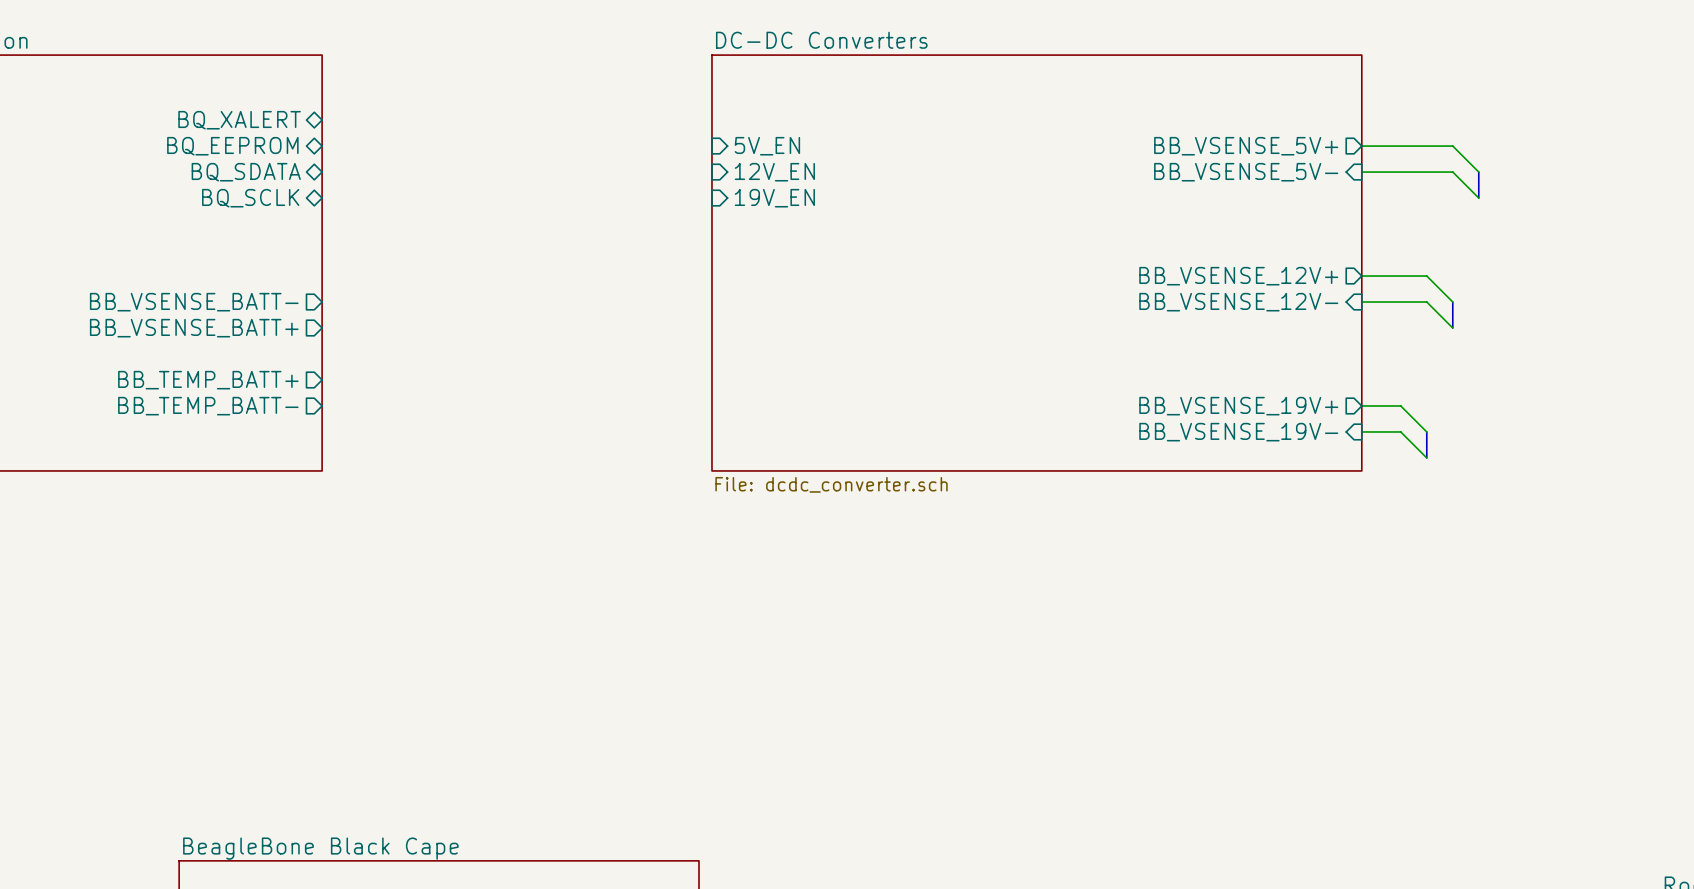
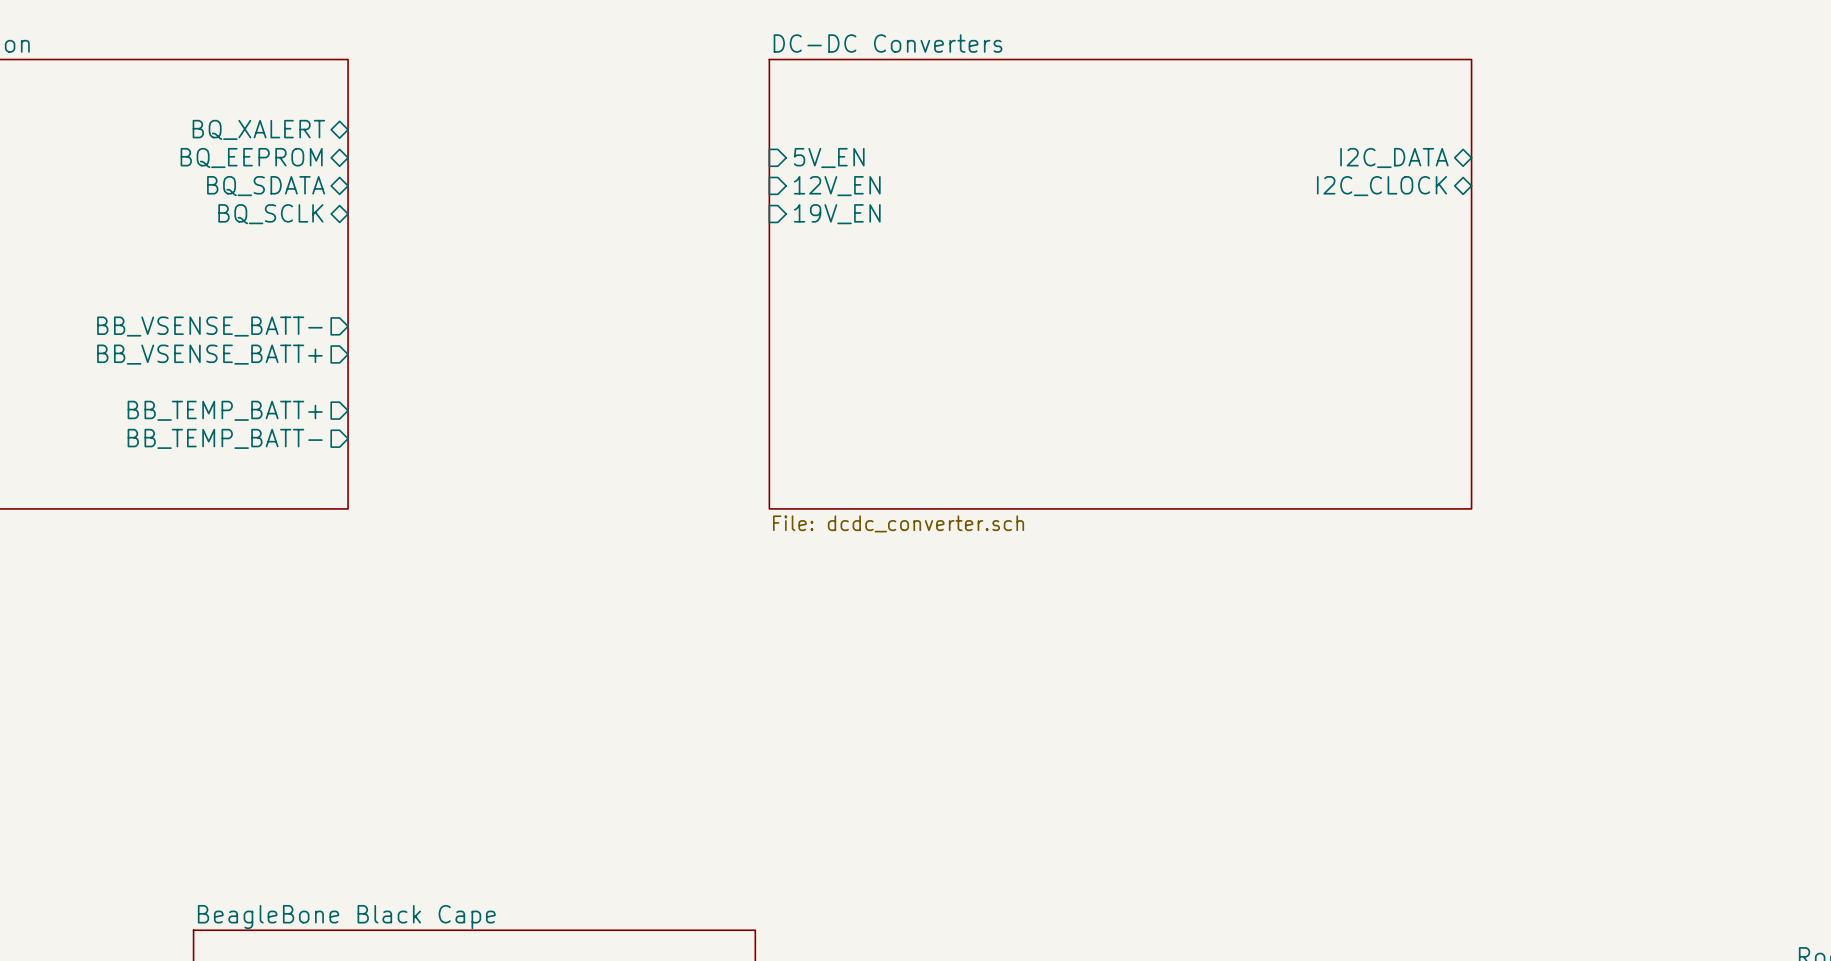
sheet pin shape: output (1246, 146) -> bidirectional (1394, 158)
sheet pin: BB_VSENSE_5V+ (1246, 146) -> I2C_DATA (1394, 158)
wire: (1361, 146) (1452, 146) (1478, 172) -> none
sheet pin shape: input (1246, 172) -> bidirectional (1381, 186)
sheet pin: BB_VSENSE_5V- (1246, 172) -> I2C_CLOCK (1381, 186)
wire: (1361, 172) (1452, 172) (1478, 198) -> none
bus: (1478, 172) (1478, 198) -> none
sheet pin: BB_VSENSE_12V+ (1238, 276) -> none
wire: (1361, 276) (1426, 276) (1452, 302) -> none
sheet pin: BB_VSENSE_12V- (1238, 302) -> none
wire: (1361, 302) (1426, 302) (1452, 328) -> none
bus: (1452, 302) (1452, 328) -> none
wire: (1361, 405) (1400, 405) (1426, 431) -> none
sheet pin: BB_VSENSE_19V+ (1238, 406) -> none
wire: (1361, 431) (1400, 431) (1426, 457) -> none
bus: (1426, 431) (1426, 457) -> none
sheet pin: BB_VSENSE_19V- (1238, 432) -> none

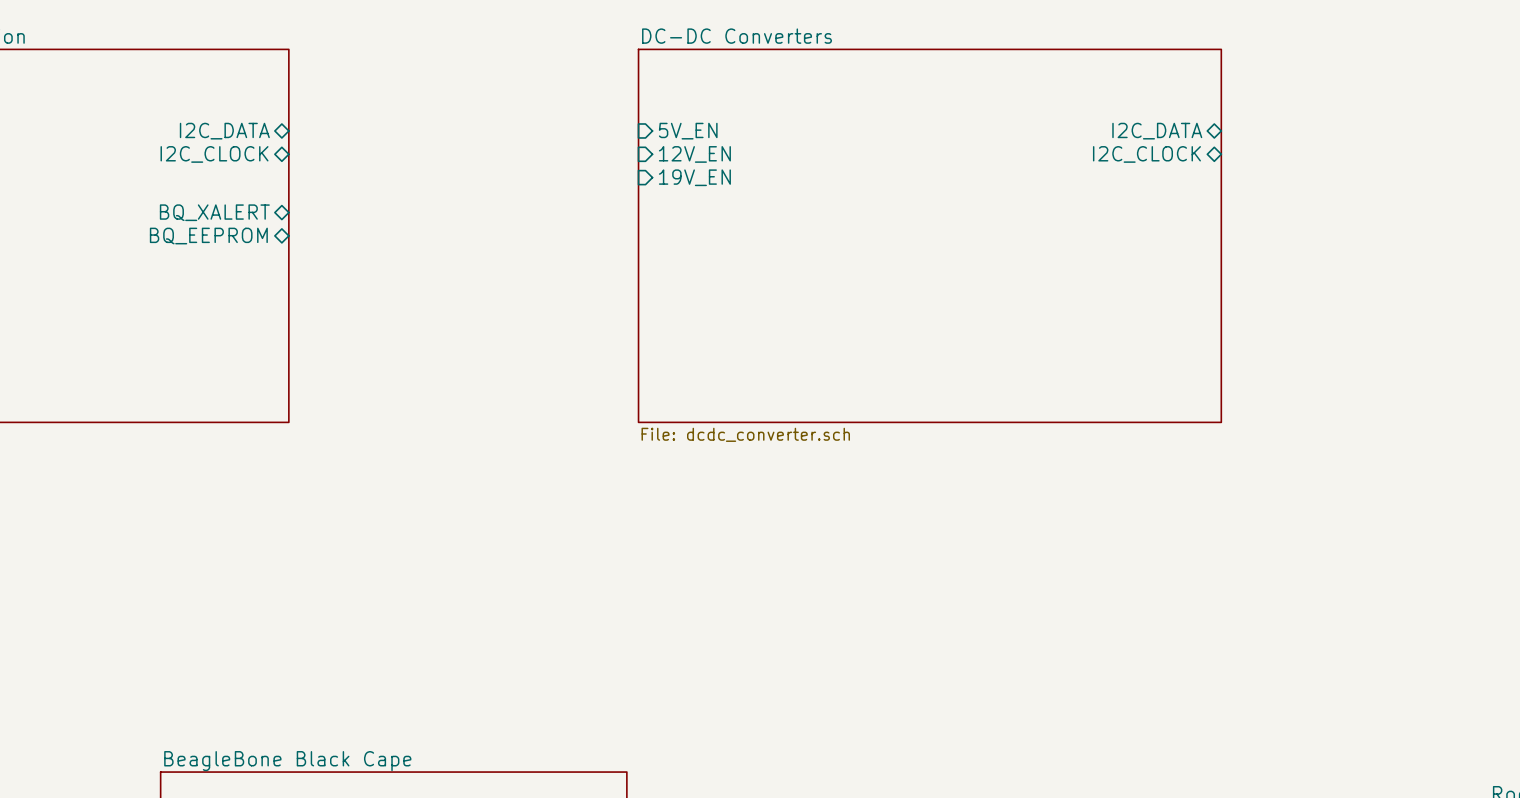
sheet pin position: BQ_XALERT (258, 129) -> BQ_XALERT (214, 212)
sheet pin: BQ_EEPROM (251, 158) -> I2C_DATA (224, 131)
sheet pin: BQ_SDATA (266, 186) -> I2C_CLOCK (214, 154)
sheet pin: BQ_SCLK (270, 214) -> none
sheet pin: none -> BQ_EEPROM (208, 236)
sheet pin: BB_VSENSE_BATT- (209, 326) -> none
sheet pin: BB_VSENSE_BATT+ (209, 354) -> none
sheet pin: BB_TEMP_BATT+ (225, 410) -> none
sheet pin: BB_TEMP_BATT- (225, 438) -> none

